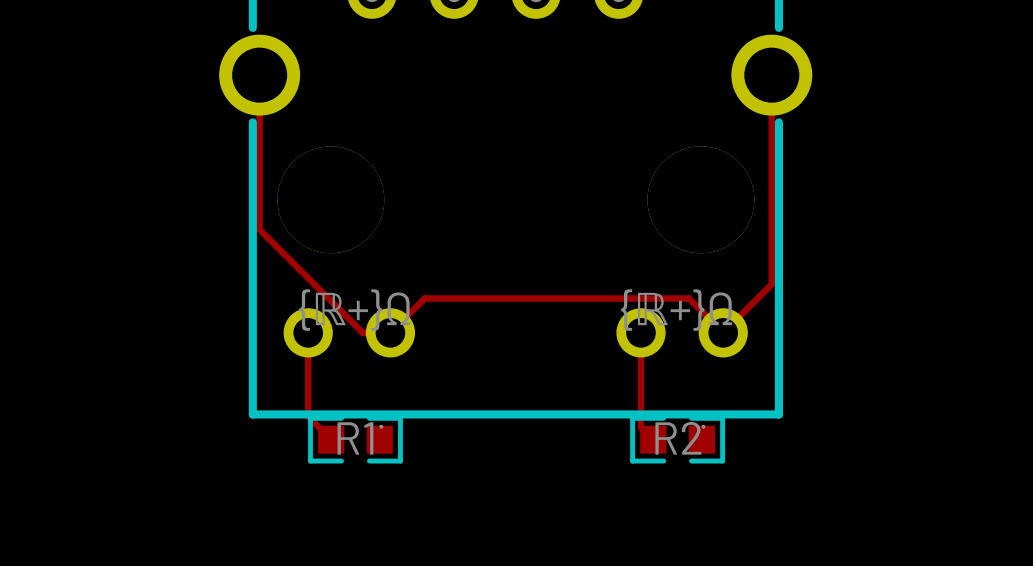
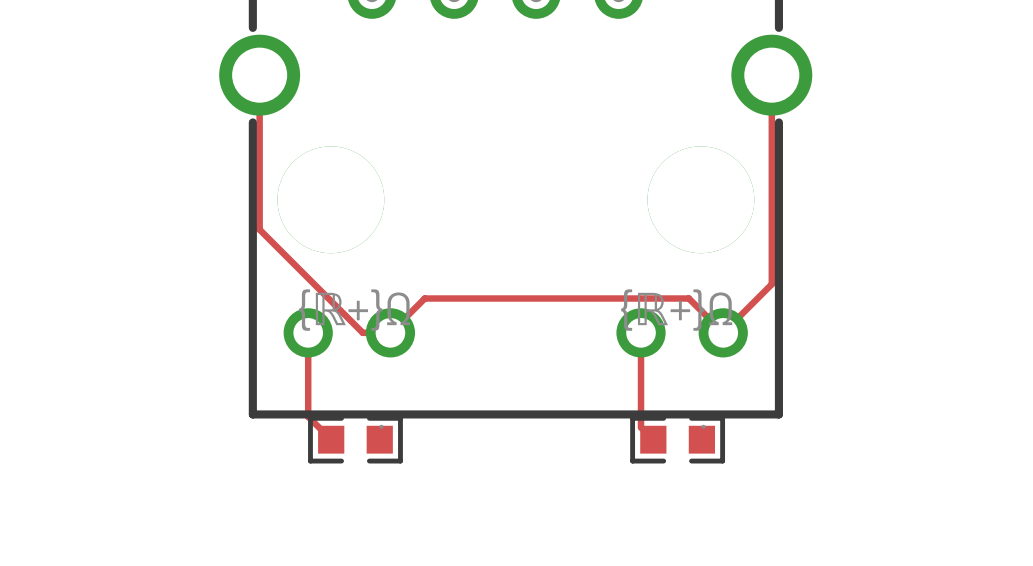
R1 name: R1 (355, 438) -> none
R2 name: R2 (678, 438) -> none

